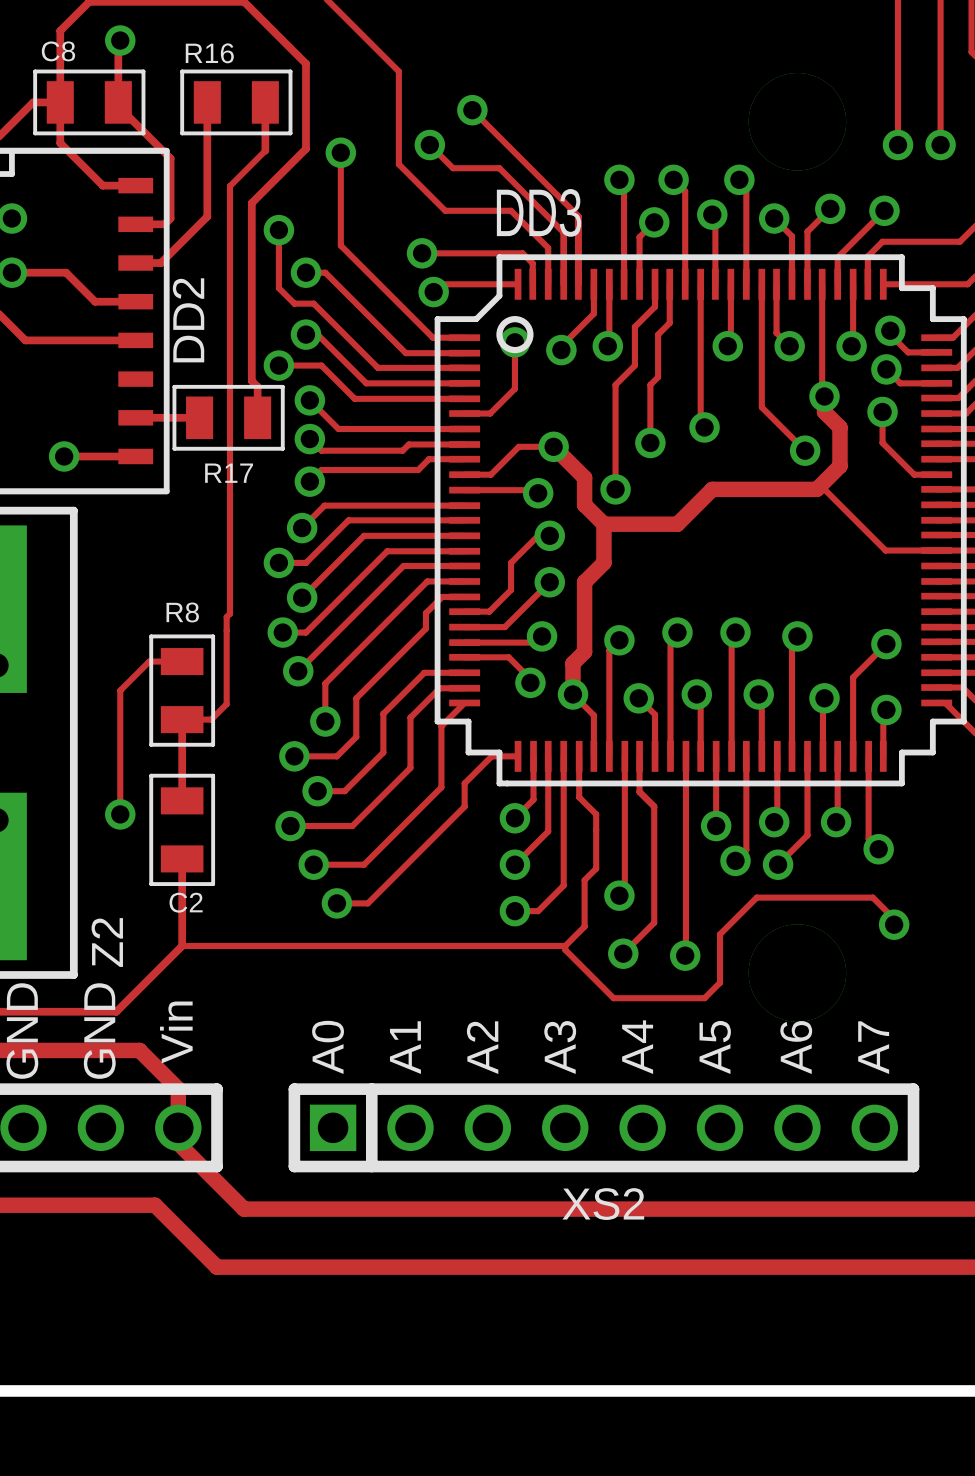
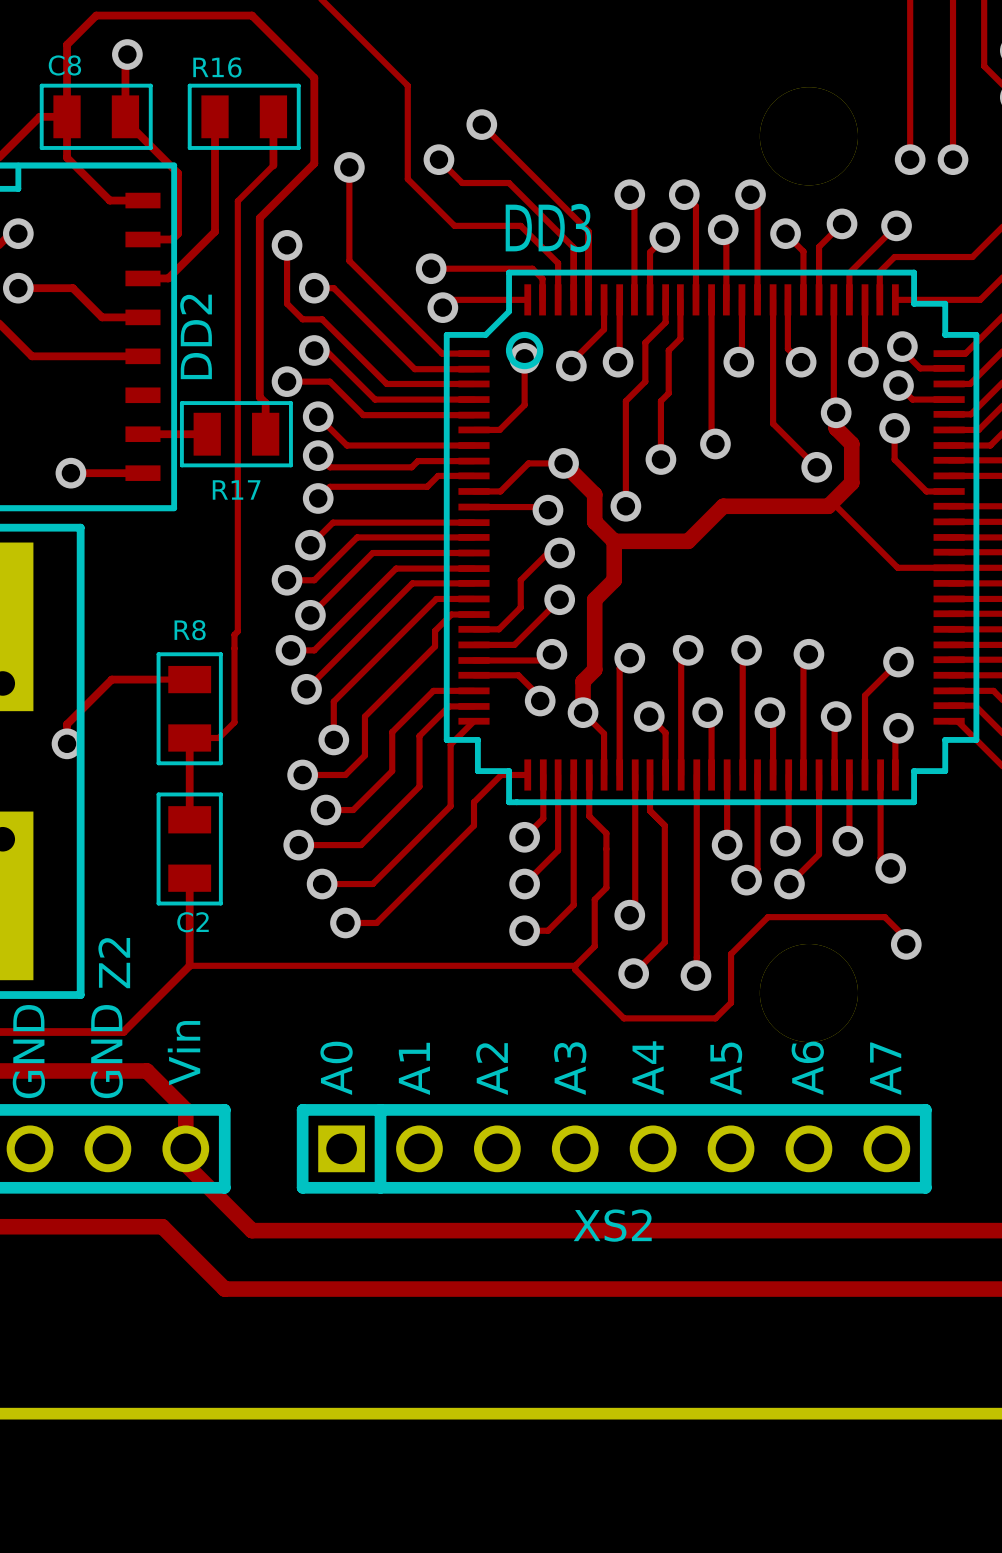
track: (149, 661) (120, 690) (120, 814) -> (156, 679) (111, 679) (67, 724) (67, 743)
via position: (120, 814) -> (67, 743)

